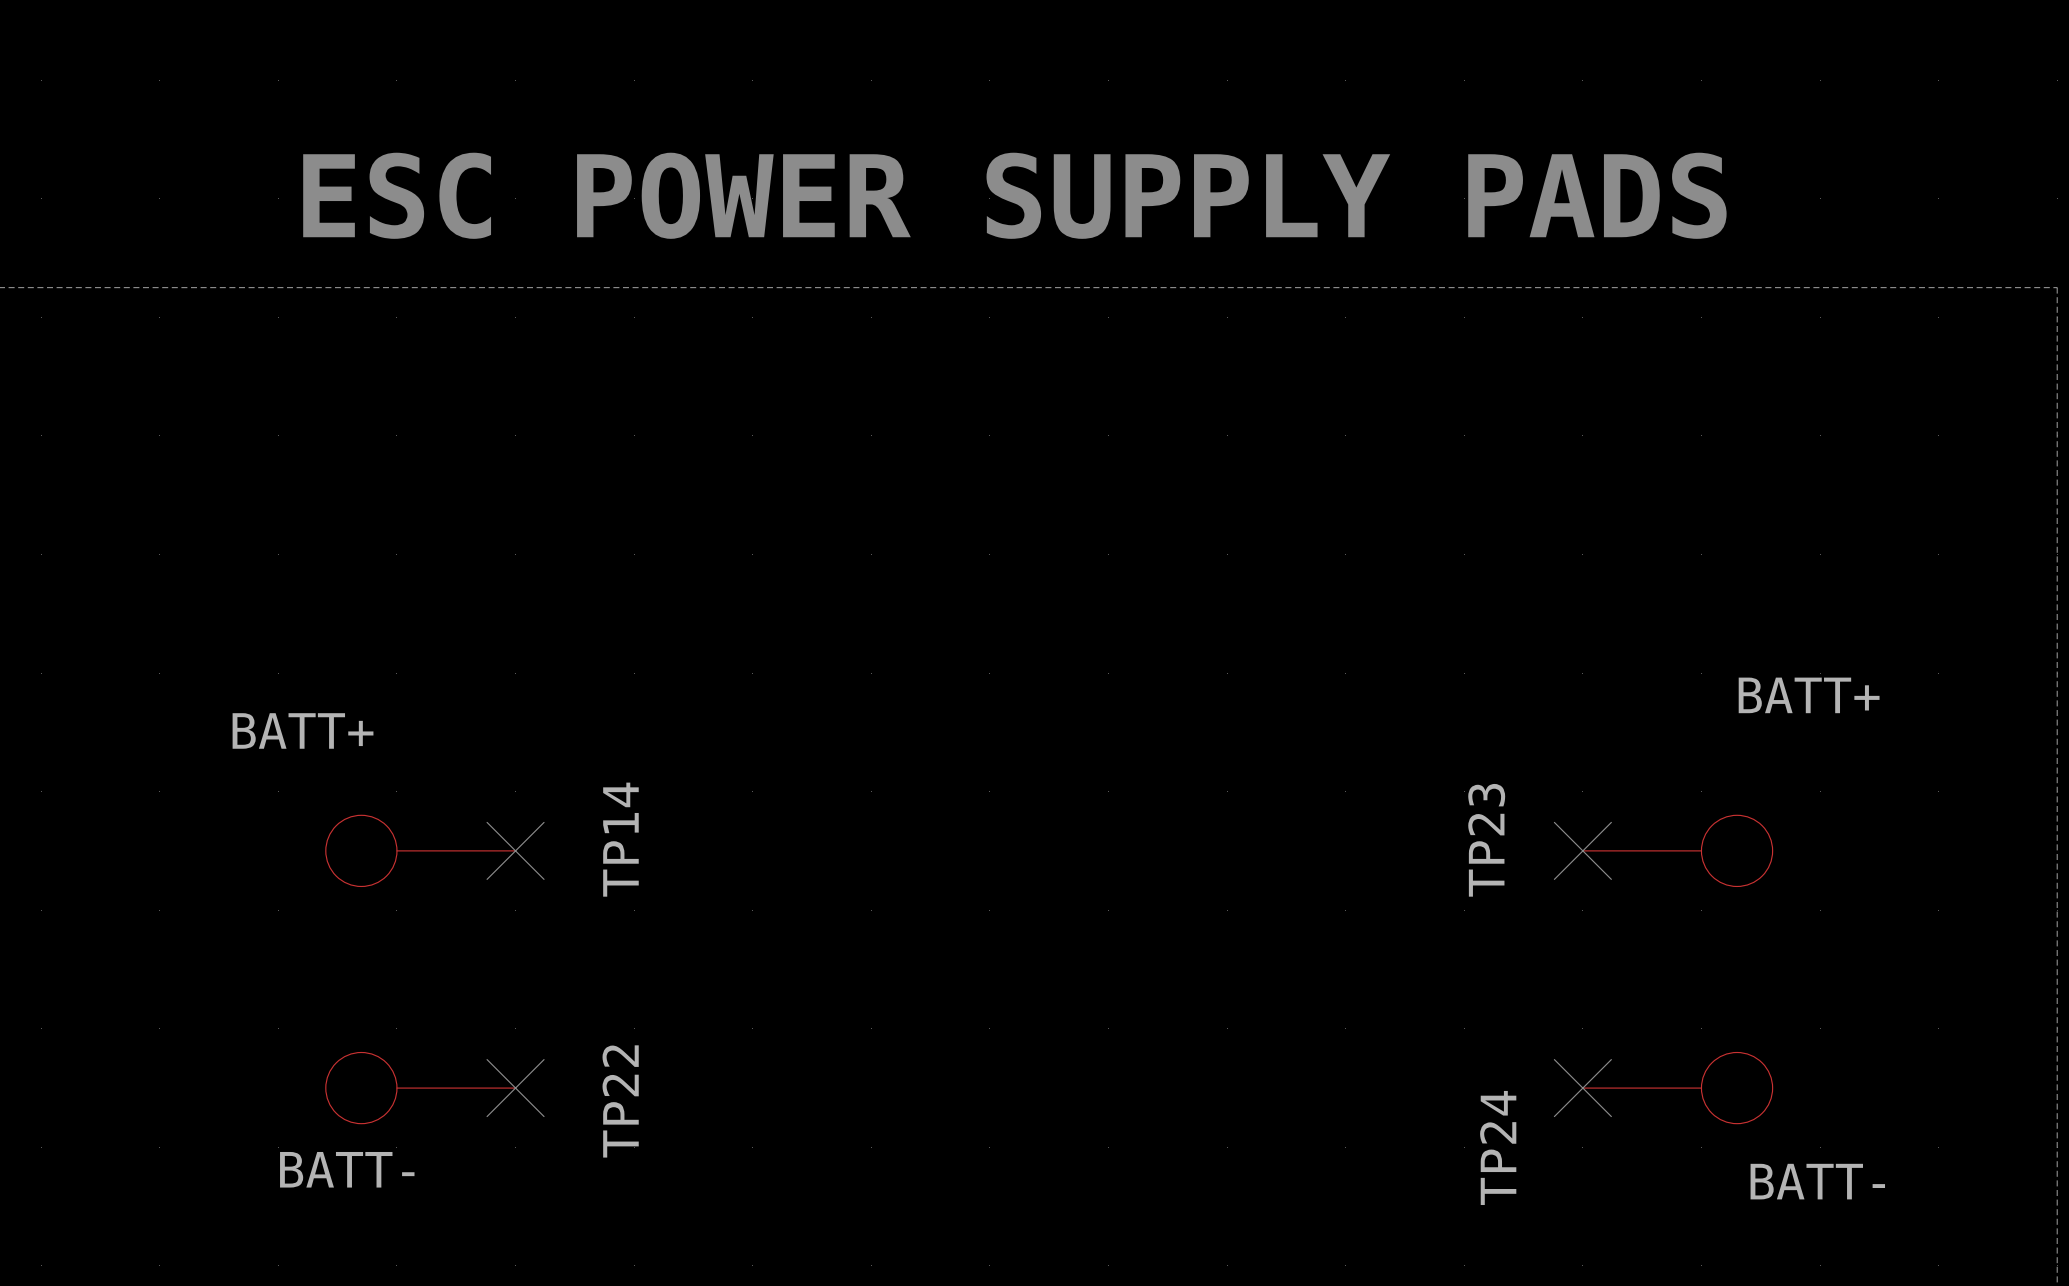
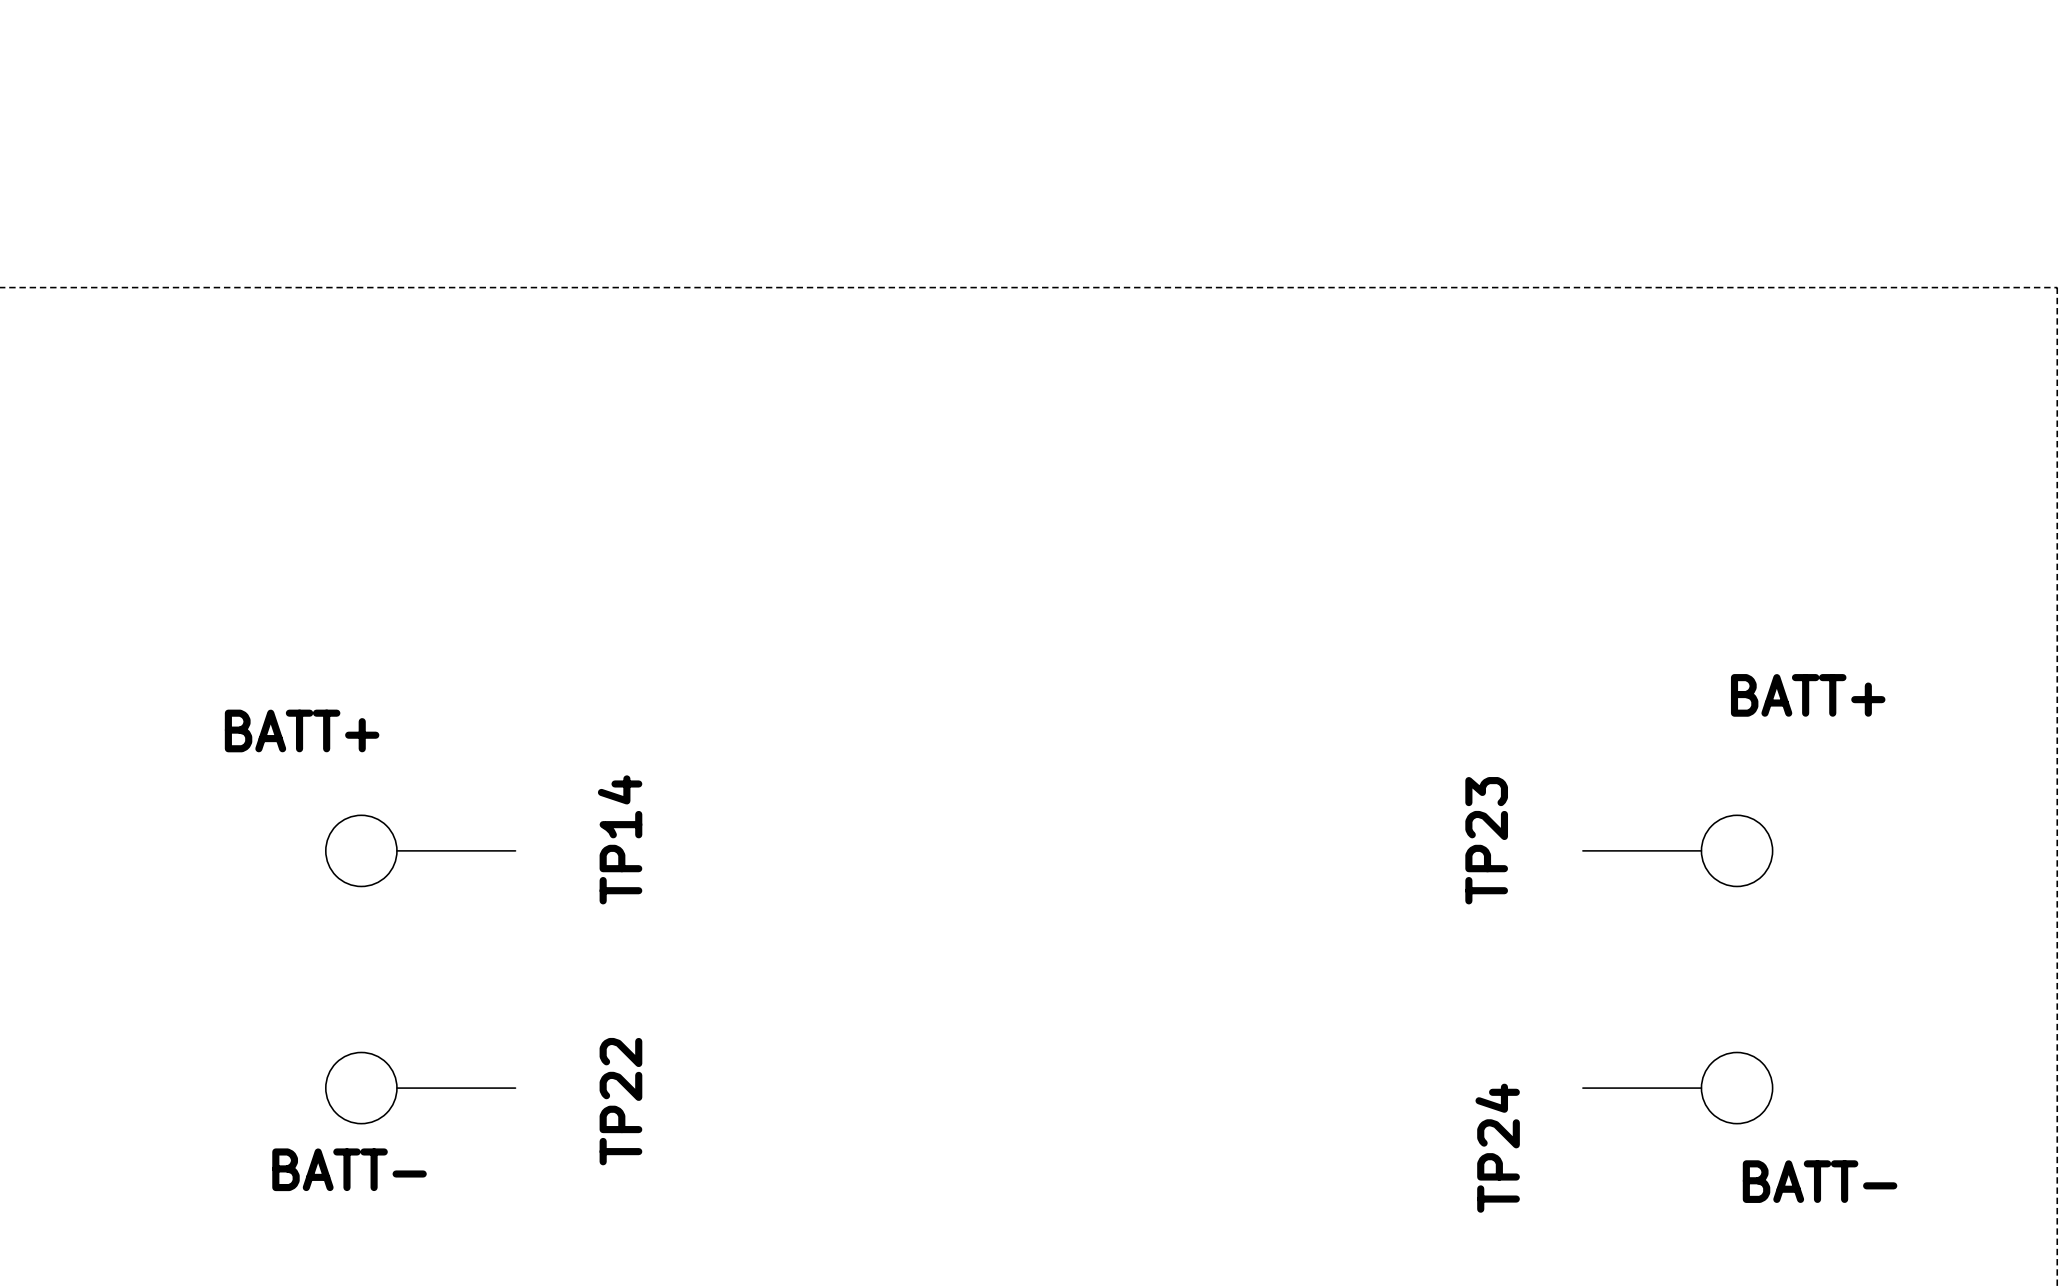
text: ESC POWER SUPPLY PADS (1014, 195) -> none
no-connect mark: (515, 850) -> none
no-connect mark: (1582, 850) -> none
no-connect mark: (515, 1088) -> none
no-connect mark: (1582, 1088) -> none

